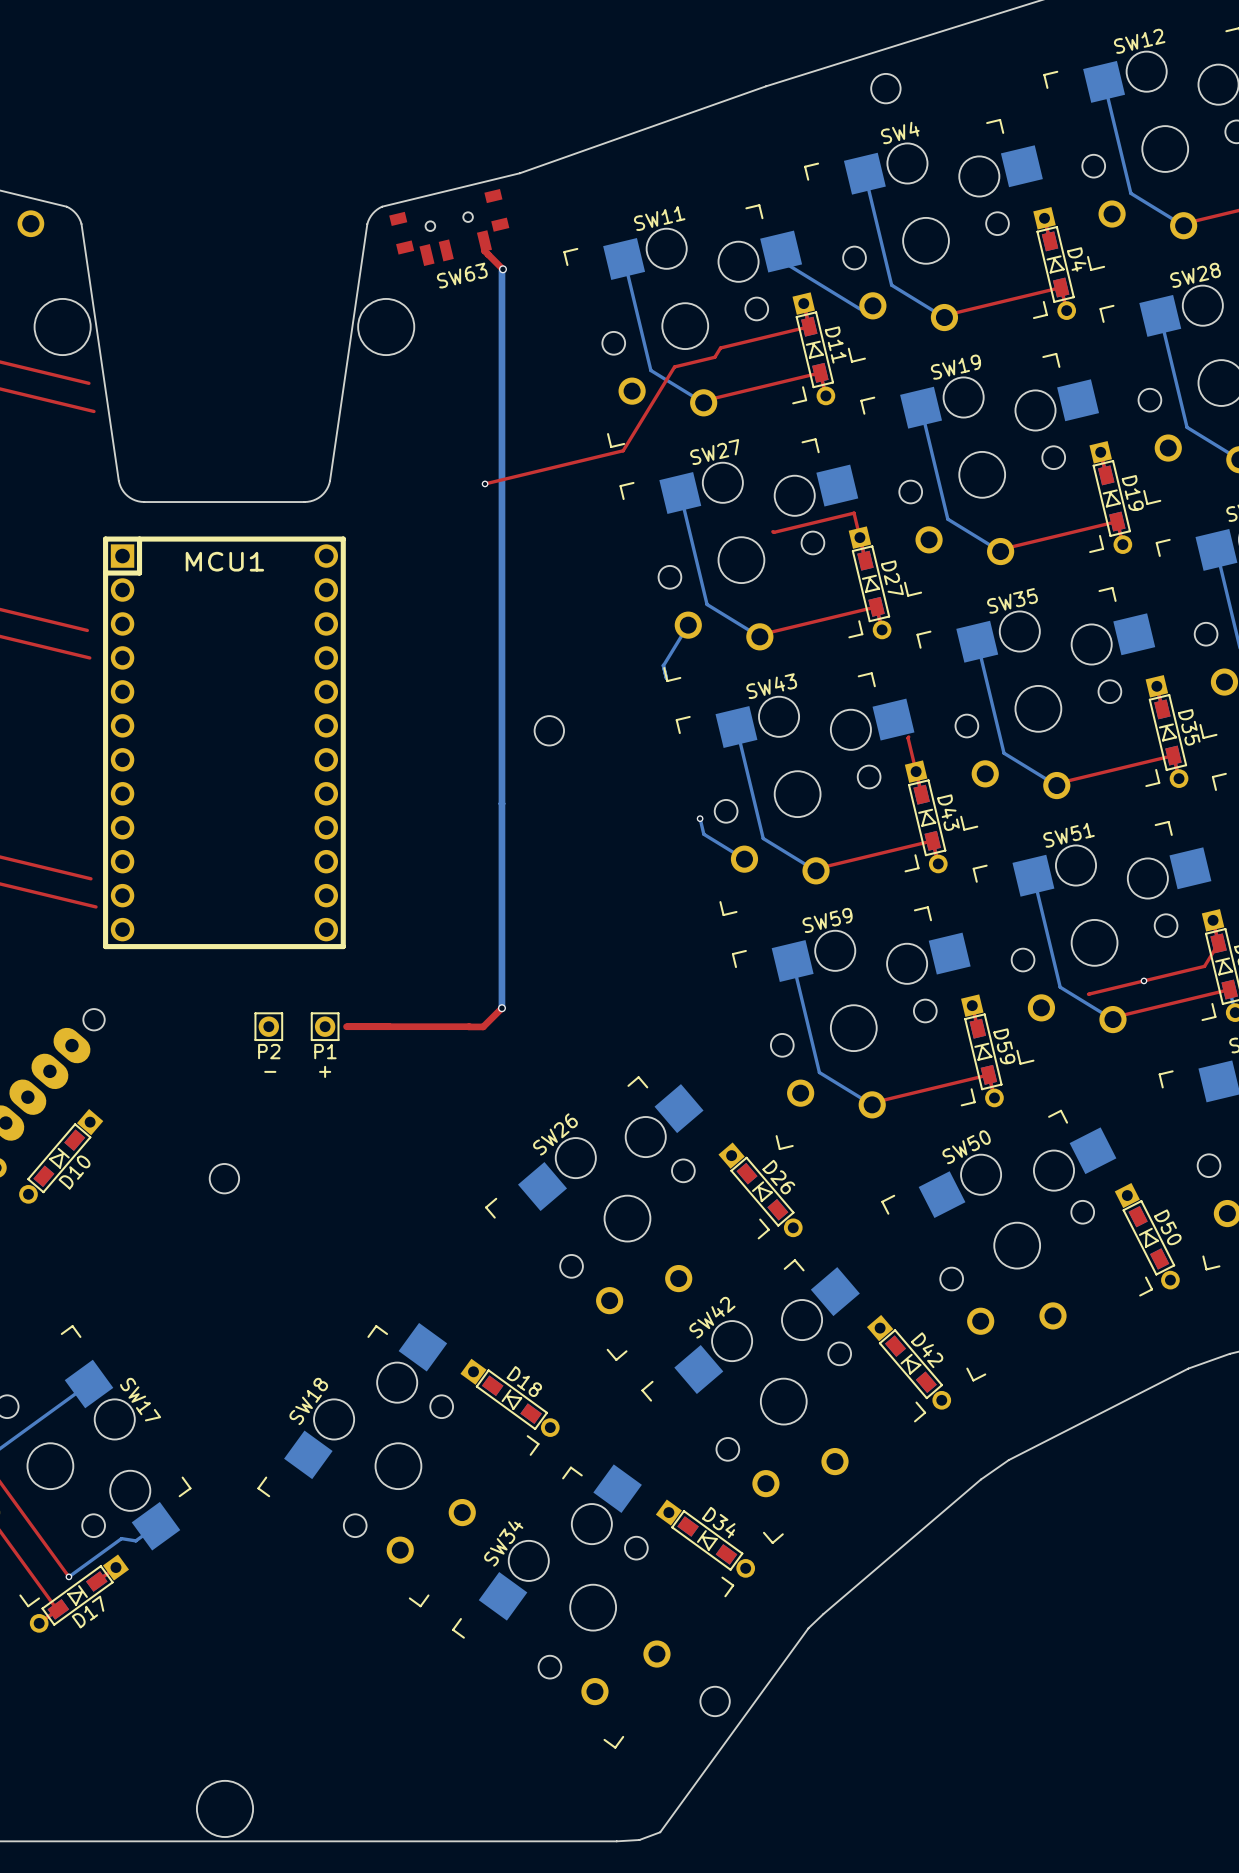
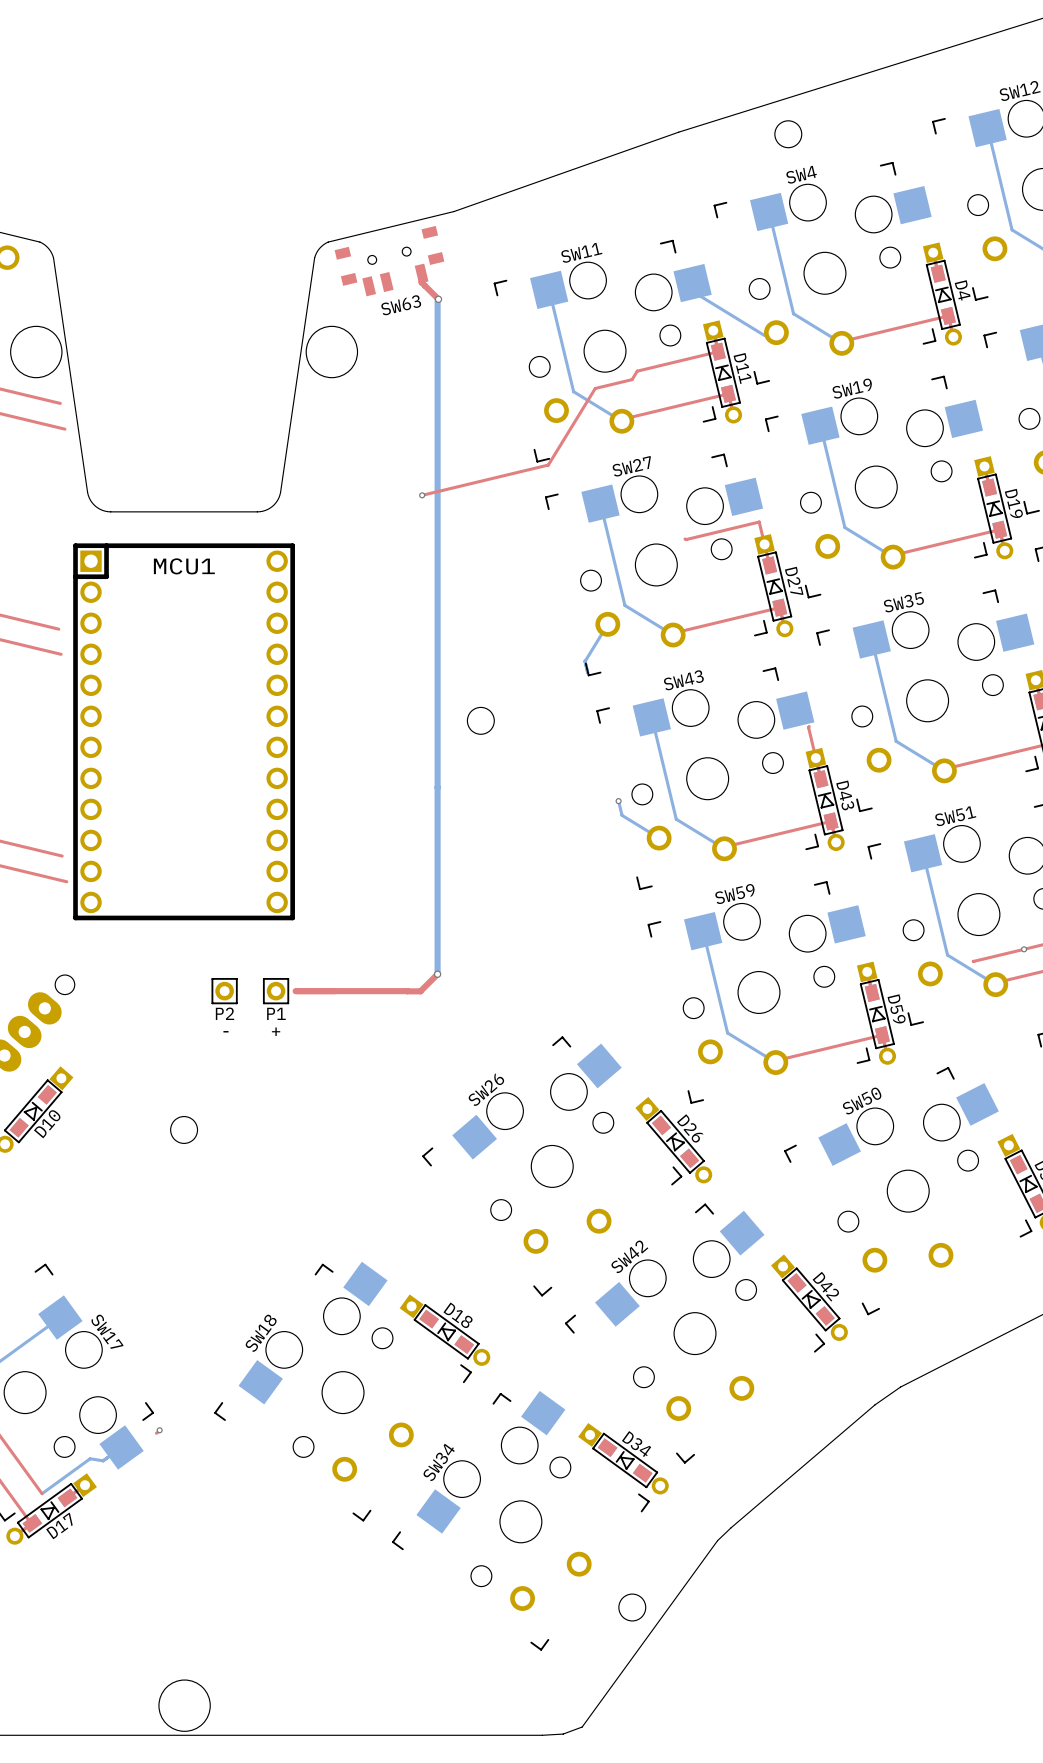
top track: none -> (159, 1430) (156, 1433)
via: none -> (159, 1430)
via: (68, 1576) -> none

